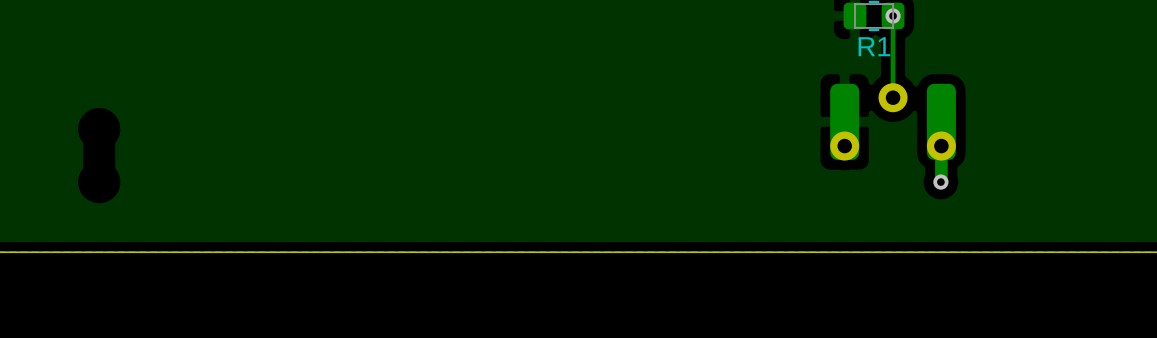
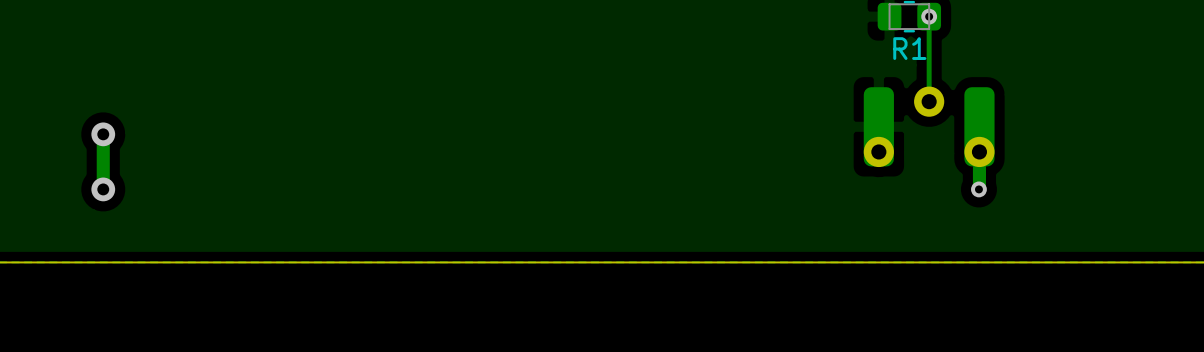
track: none -> (103, 134) (103, 189)
via: none -> (103, 134)
via: none -> (103, 189)

